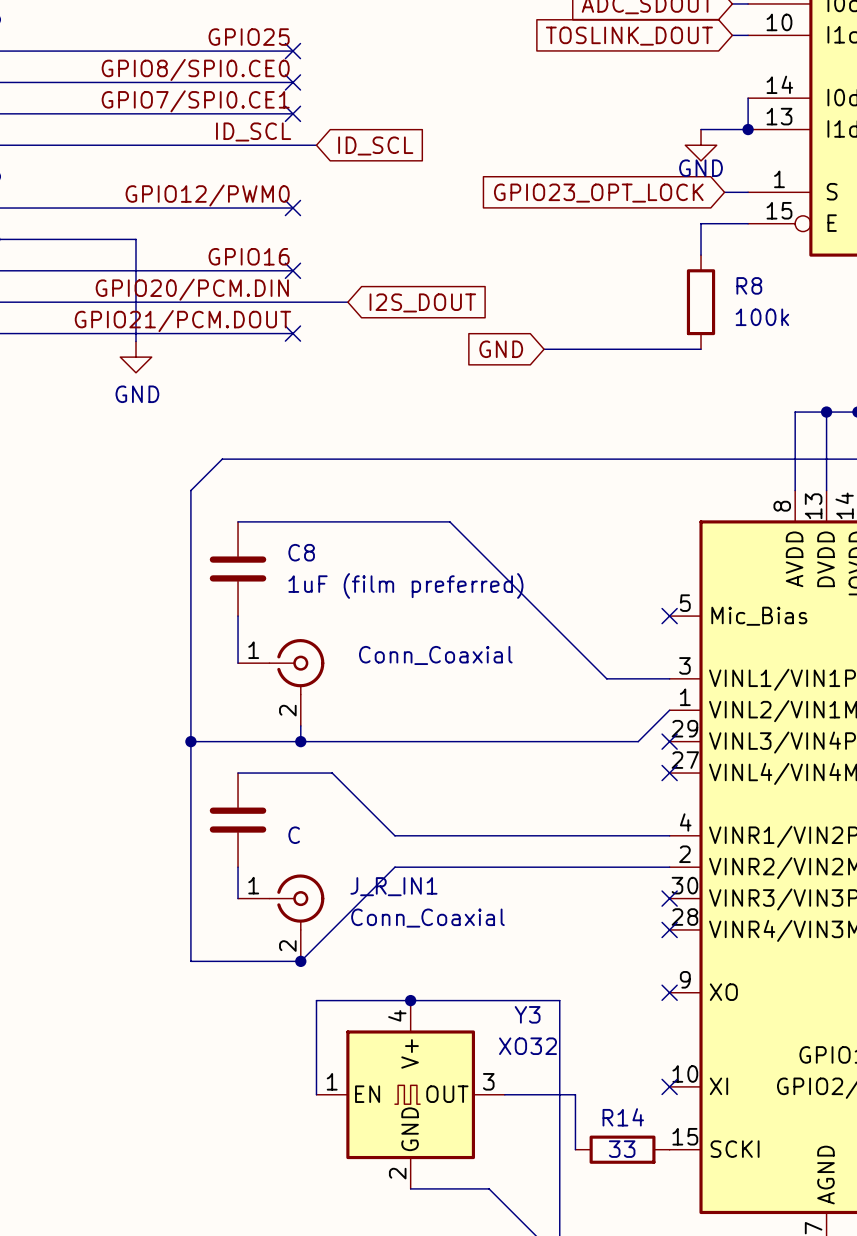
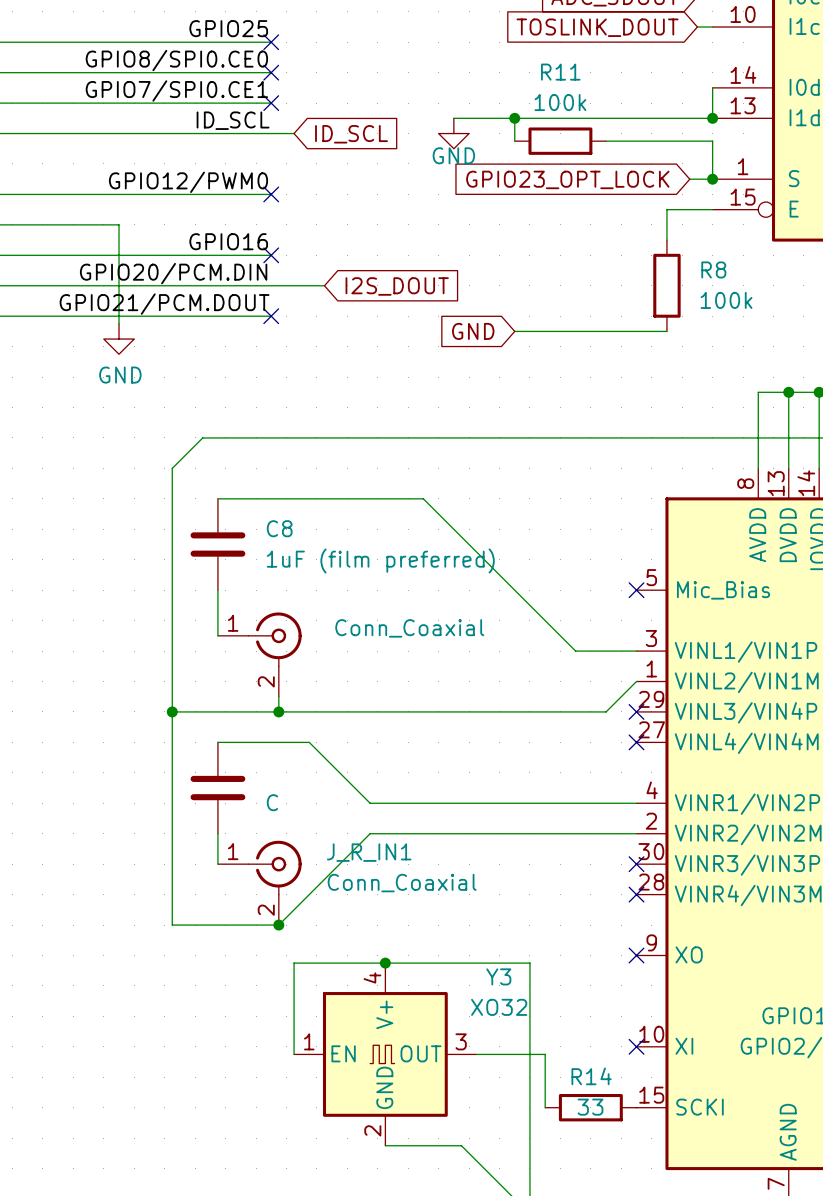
wire: none -> (453, 118) (666, 118)
wire: none -> (514, 118) (514, 141)
junction: none -> (514, 118)
power symbol position: GND (701, 145) -> GND (453, 133)
R11: none -> 100k (560, 141)
wire: none -> (606, 141) (712, 141) (712, 179)
junction: none -> (712, 179)

